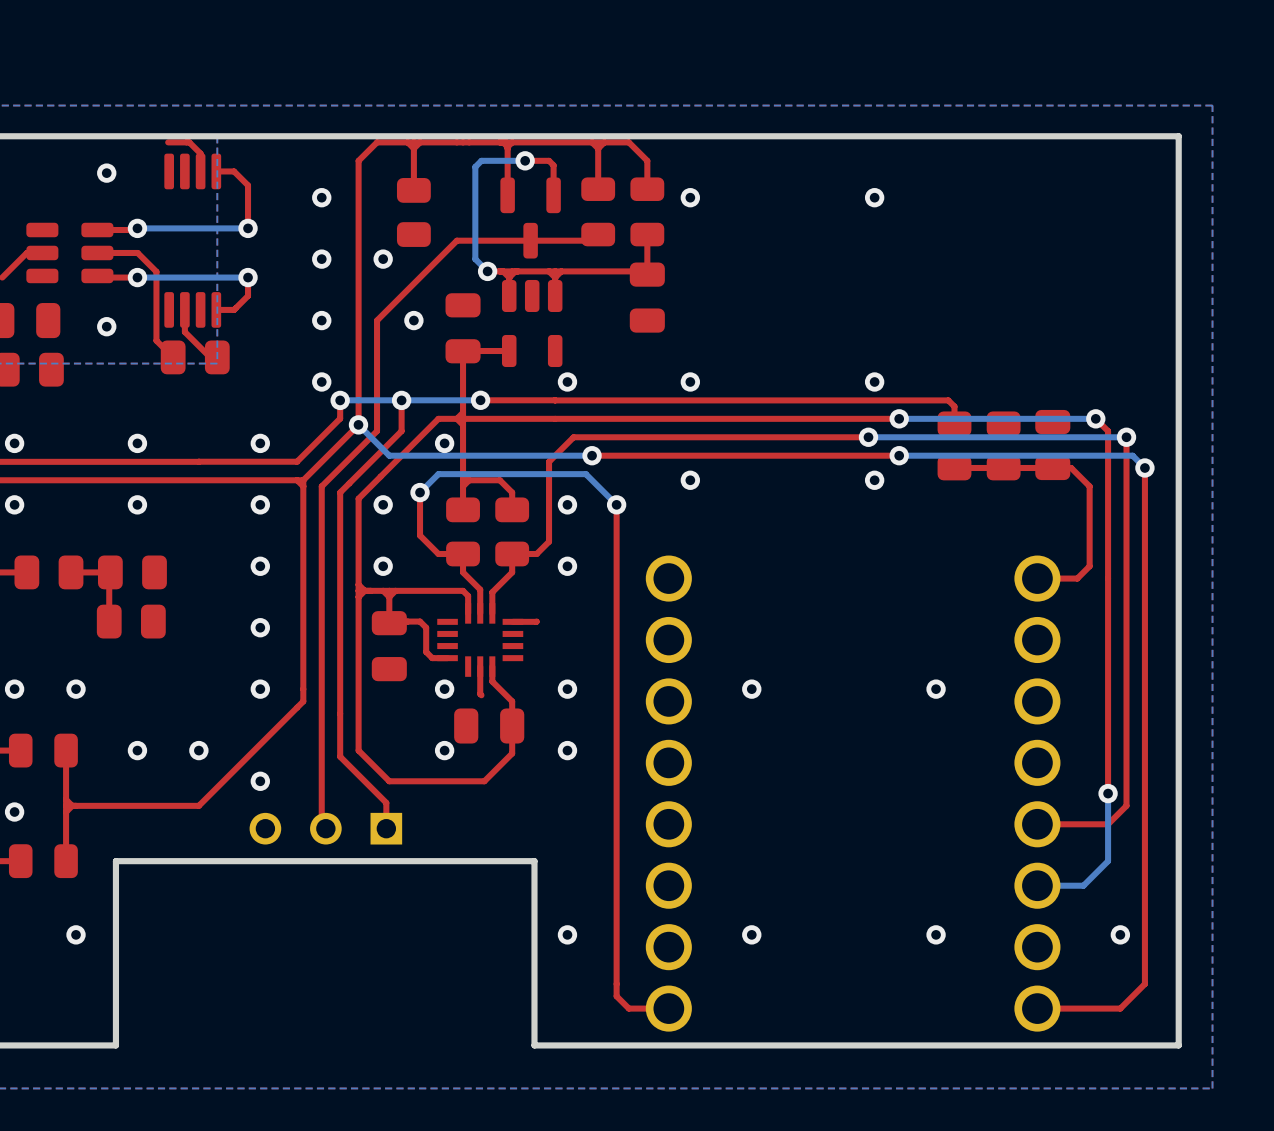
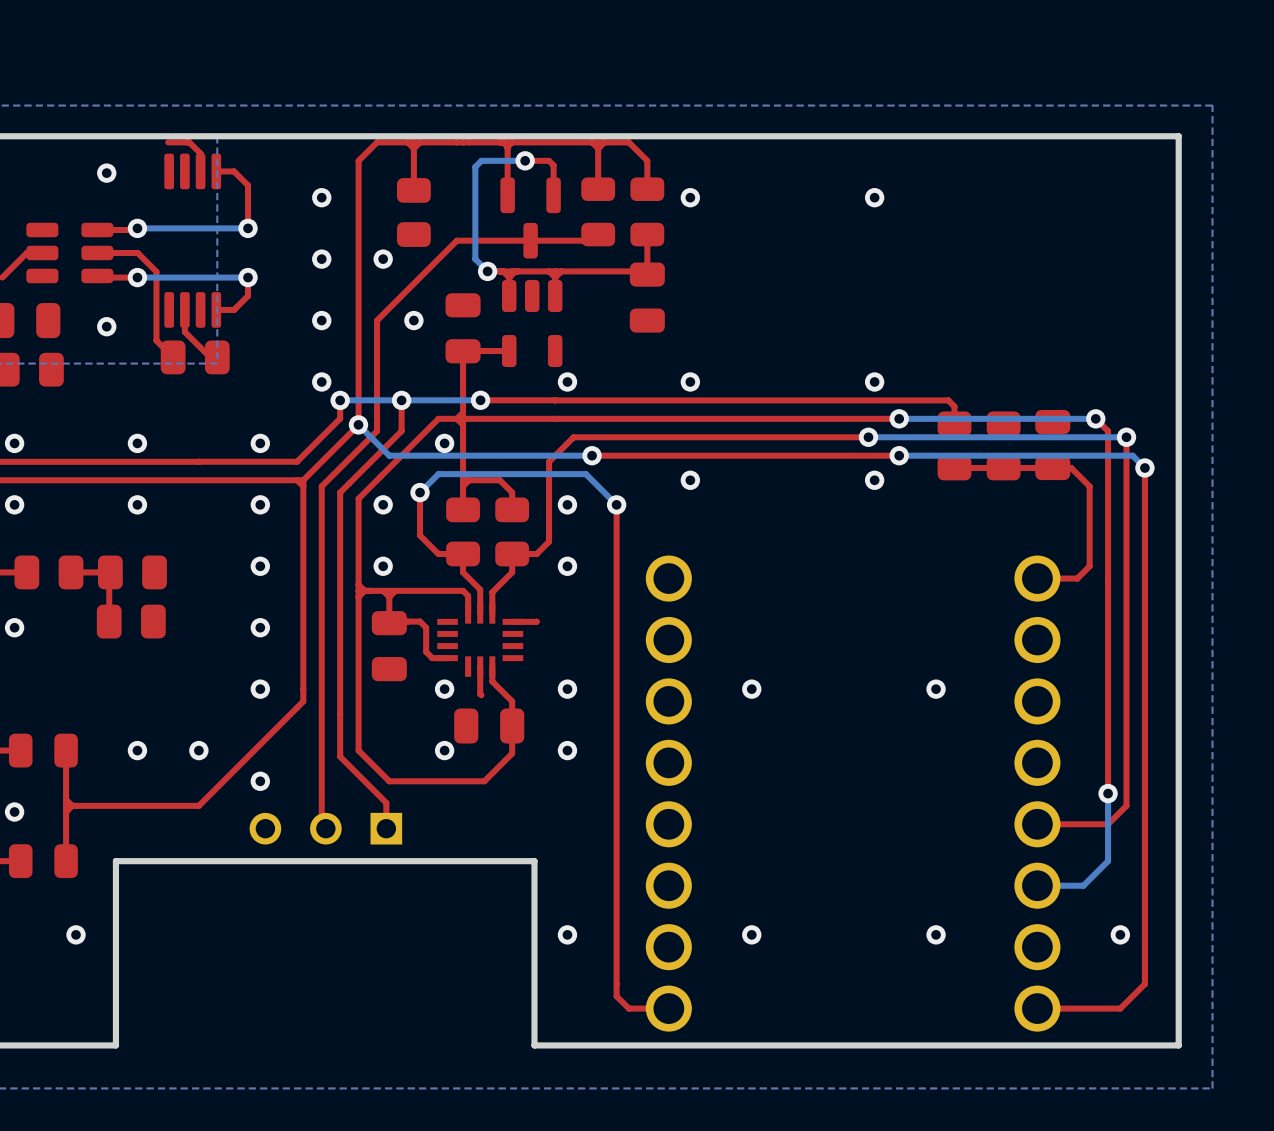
via: none -> (14, 627)
via: (14, 689) -> none
via: (76, 689) -> none

